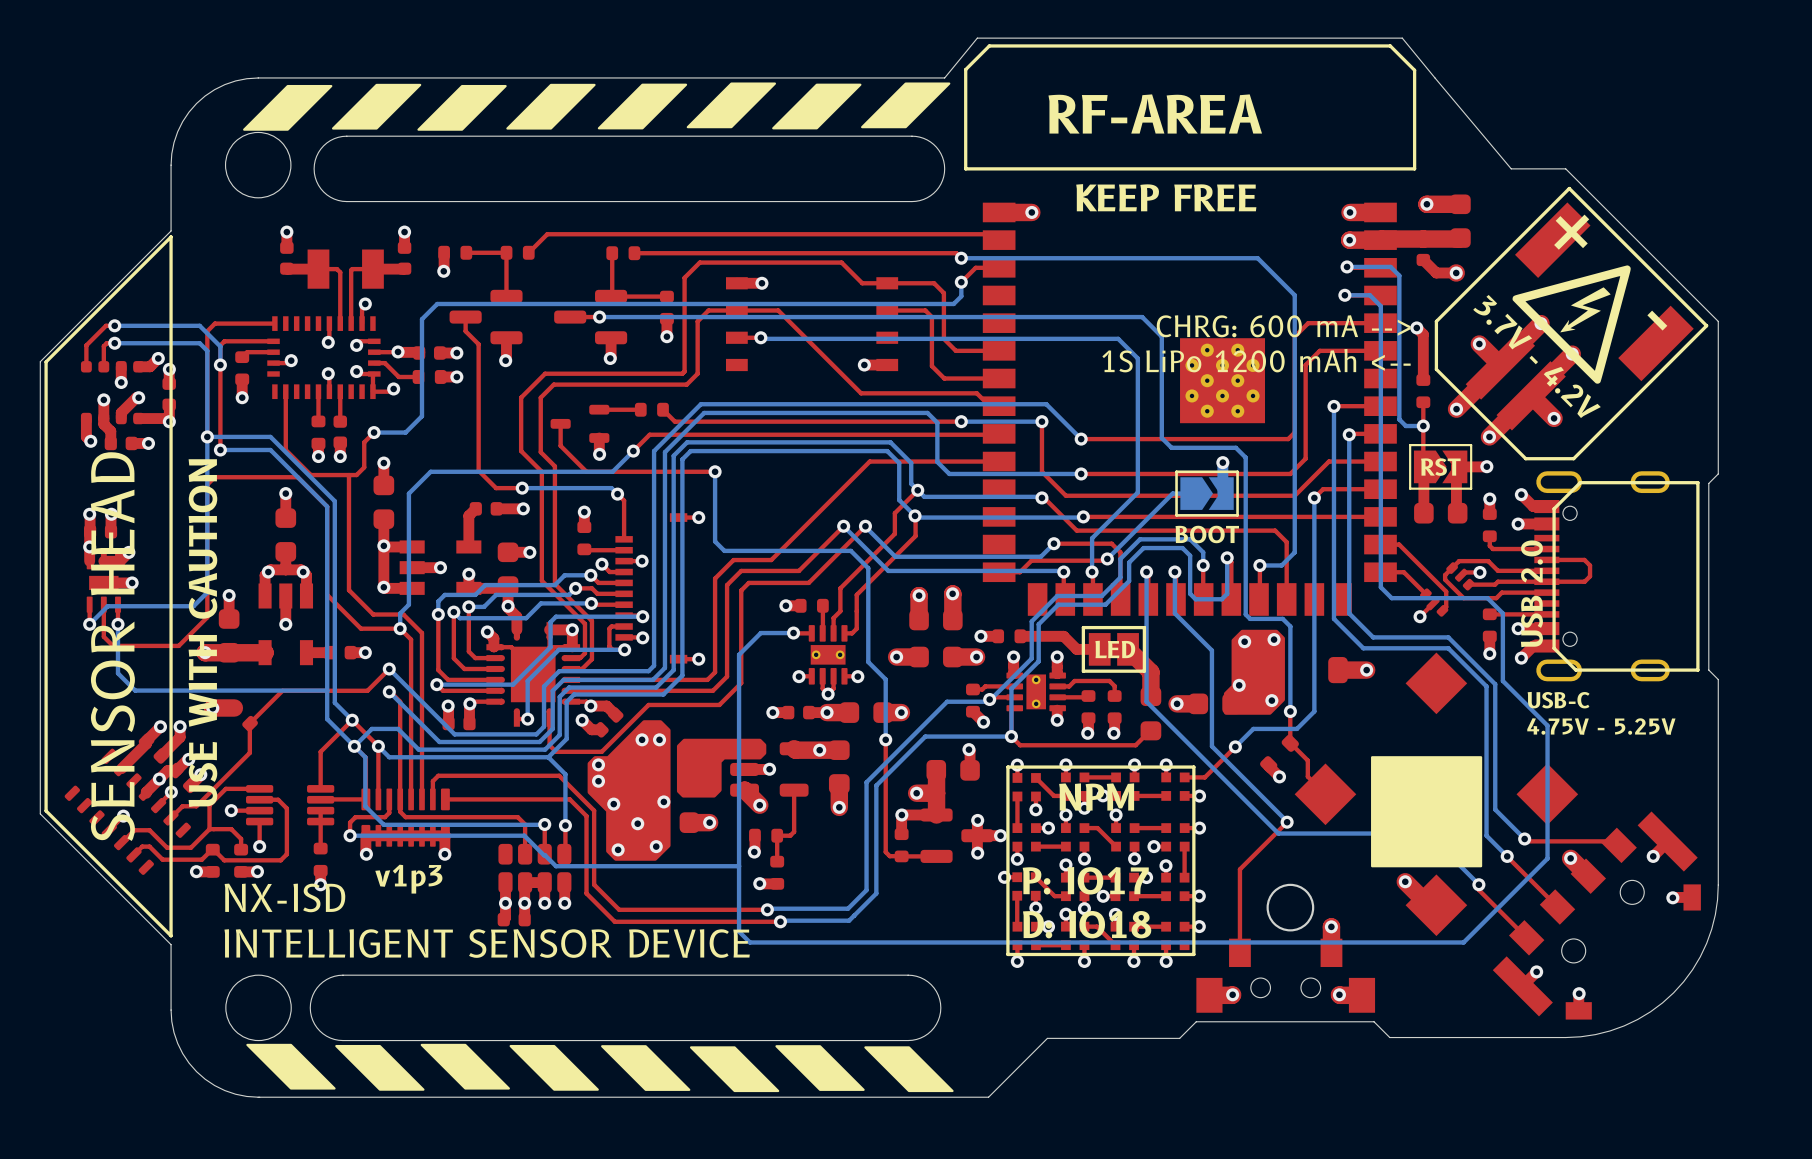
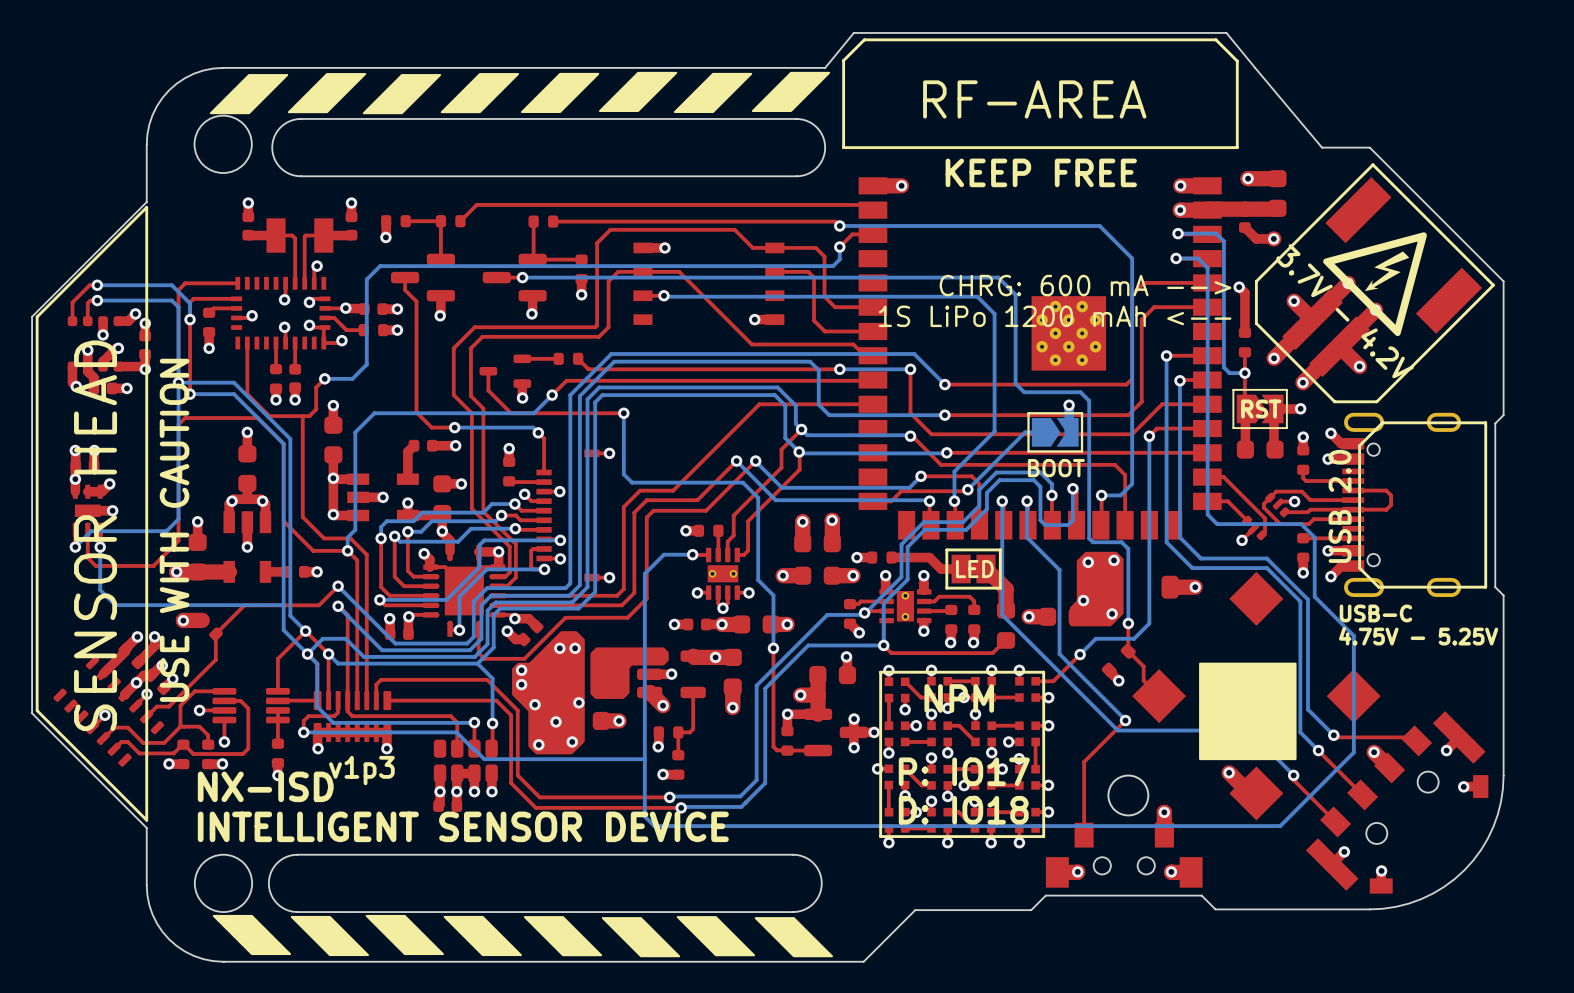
text: + (1571, 232) -> none
text: - (1657, 320) -> none

